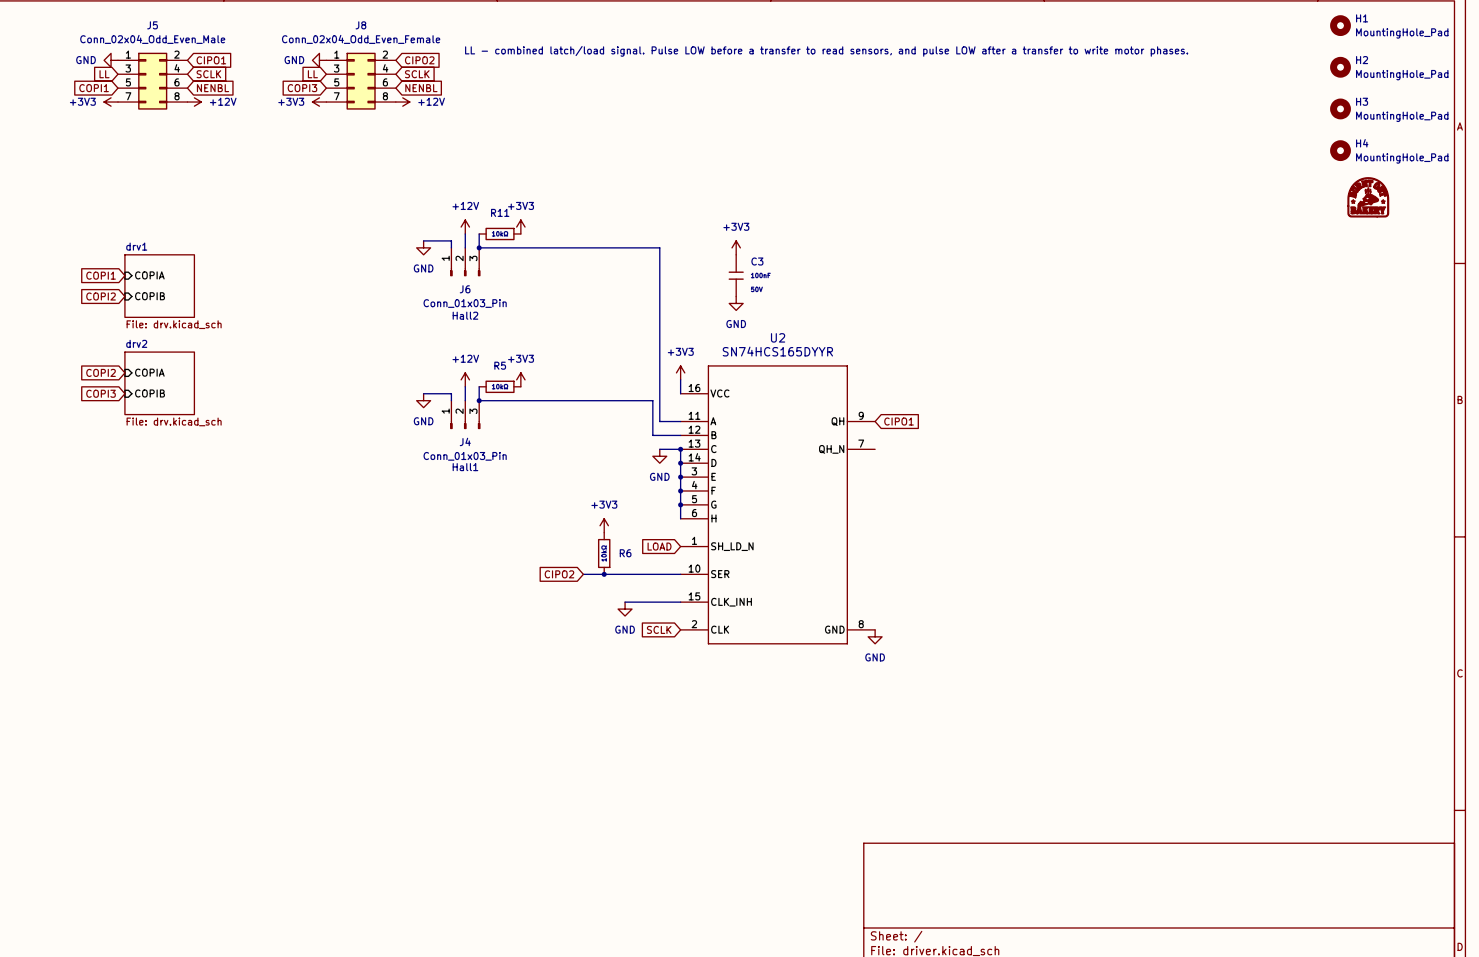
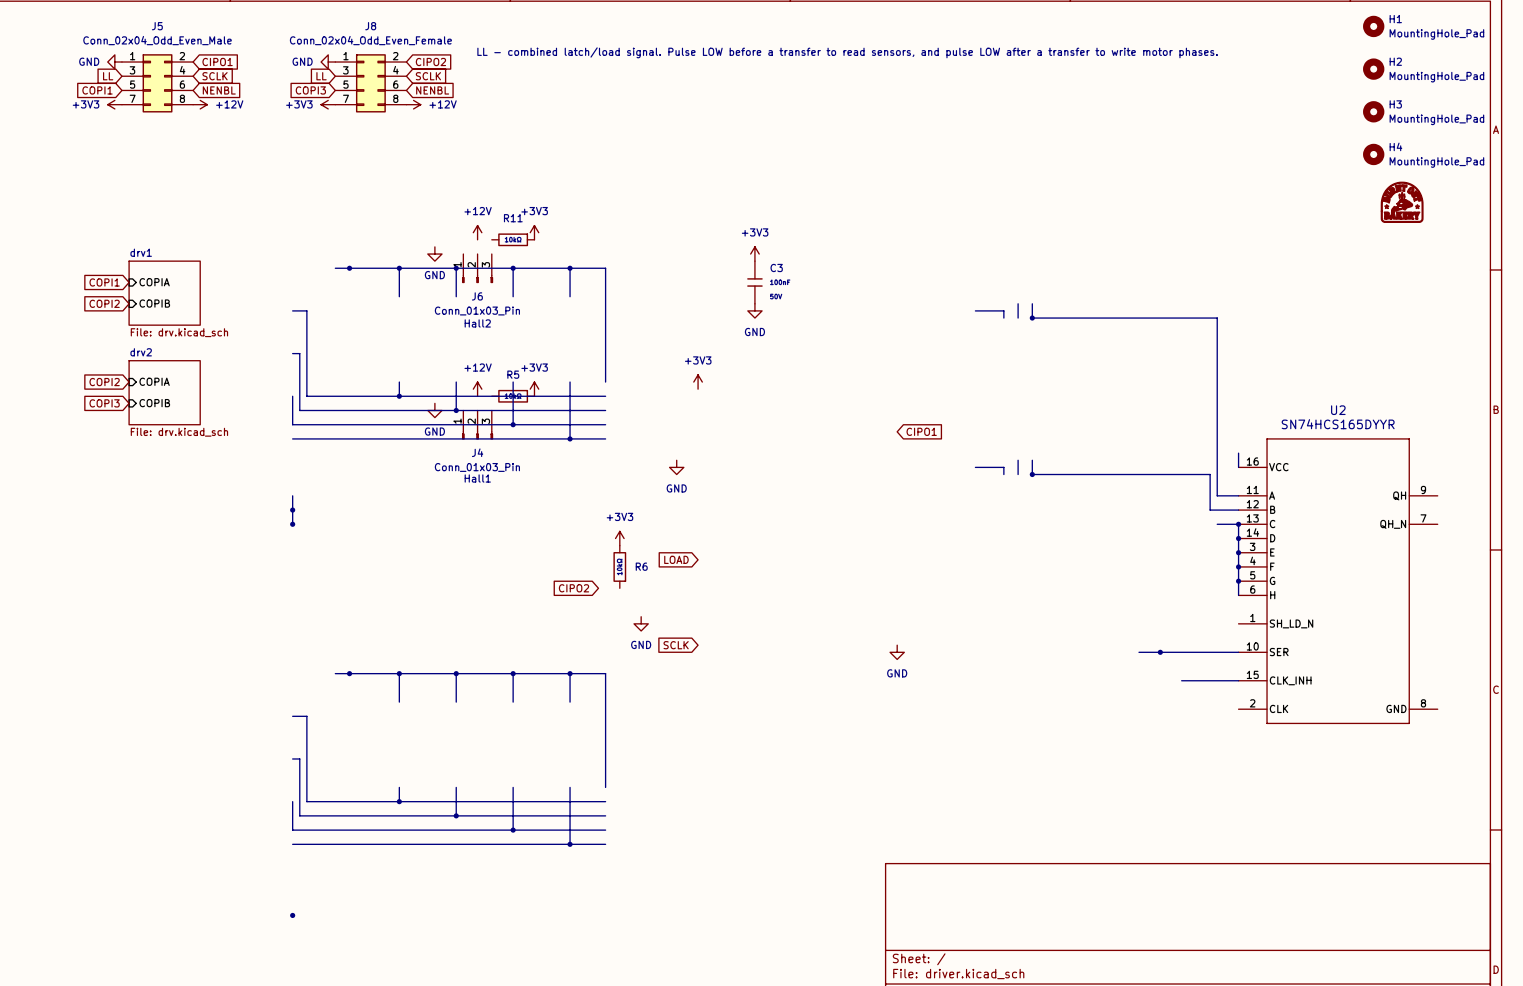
wire: (465, 233) (465, 247) -> none
wire: (479, 233) (479, 247) (659, 247) (659, 421) (680, 421) -> none
wire: (423, 240) (451, 240) (451, 247) -> none
junction: (479, 247) -> none
wire: none -> (335, 268) (605, 268) (605, 382)
junction: none -> (349, 268)
wire: none -> (399, 268) (399, 296)
junction: none -> (399, 268)
wire: none -> (456, 268) (456, 296)
junction: none -> (456, 268)
wire: none -> (513, 268) (513, 296)
junction: none -> (513, 268)
wire: none -> (570, 268) (570, 296)
junction: none -> (570, 268)
wire: none -> (1018, 303) (1018, 318)
wire: none -> (1032, 303) (1032, 318) (1217, 318) (1217, 495) (1238, 495)
wire: none -> (292, 310) (306, 310) (306, 396) (605, 396)
wire: none -> (975, 310) (1003, 310) (1003, 318)
junction: none -> (1032, 318)
wire: none -> (456, 382) (456, 410)
wire: none -> (513, 382) (513, 424)
wire: none -> (570, 382) (570, 438)
wire: (680, 379) (680, 393) -> none
wire: none -> (292, 396) (292, 424) (605, 424)
junction: none -> (399, 396)
wire: (465, 386) (465, 400) -> (399, 382) (399, 396)
wire: (479, 386) (479, 400) -> (292, 353) (299, 353) (299, 410) (491, 410)
wire: (423, 393) (451, 393) (451, 400) -> none
junction: none -> (456, 410)
junction: (479, 400) -> none
wire: (590, 400) (652, 400) (652, 435) (680, 435) -> none
junction: none -> (513, 424)
wire: none -> (292, 438) (605, 438)
junction: none -> (570, 438)
wire: none -> (1238, 453) (1238, 467)
wire: (659, 449) (680, 449) (680, 518) -> none
junction: (680, 449) -> none
wire: none -> (1018, 460) (1018, 474)
wire: none -> (1032, 460) (1032, 474) (1210, 474) (1210, 510) (1238, 510)
wire: none -> (975, 467) (1003, 467) (1003, 474)
junction: (680, 463) -> none
junction: none -> (1032, 474)
junction: (680, 477) -> none
wire: none -> (292, 495) (292, 524)
junction: (680, 490) -> none
junction: none -> (292, 510)
junction: (680, 504) -> none
U2 position: (777, 504) -> (1338, 581)
junction: none -> (292, 524)
wire: none -> (1217, 524) (1238, 524) (1238, 595)
junction: none -> (1238, 524)
junction: none -> (1238, 538)
junction: none -> (1238, 552)
junction: none -> (1238, 566)
junction: none -> (1238, 581)
wire: (583, 574) (680, 574) -> none
junction: (604, 574) -> none
wire: (625, 602) (680, 602) -> none
wire: none -> (1139, 652) (1238, 652)
junction: none -> (1160, 652)
wire: none -> (335, 673) (605, 673) (605, 787)
junction: none -> (349, 673)
wire: none -> (399, 673) (399, 702)
junction: none -> (399, 673)
wire: none -> (456, 673) (456, 702)
junction: none -> (456, 673)
wire: none -> (513, 673) (513, 702)
junction: none -> (513, 673)
wire: none -> (570, 673) (570, 702)
junction: none -> (570, 673)
wire: none -> (1181, 680) (1238, 680)
wire: none -> (292, 716) (306, 716) (306, 801) (605, 801)
wire: none -> (292, 758) (299, 758) (299, 815) (605, 815)
wire: none -> (399, 787) (399, 801)
wire: none -> (456, 787) (456, 815)
wire: none -> (513, 787) (513, 830)
wire: none -> (570, 787) (570, 844)
wire: none -> (292, 801) (292, 830) (605, 830)
junction: none -> (399, 801)
junction: none -> (456, 815)
junction: none -> (513, 830)
wire: none -> (292, 844) (605, 844)
junction: none -> (570, 844)
junction: none -> (292, 915)

